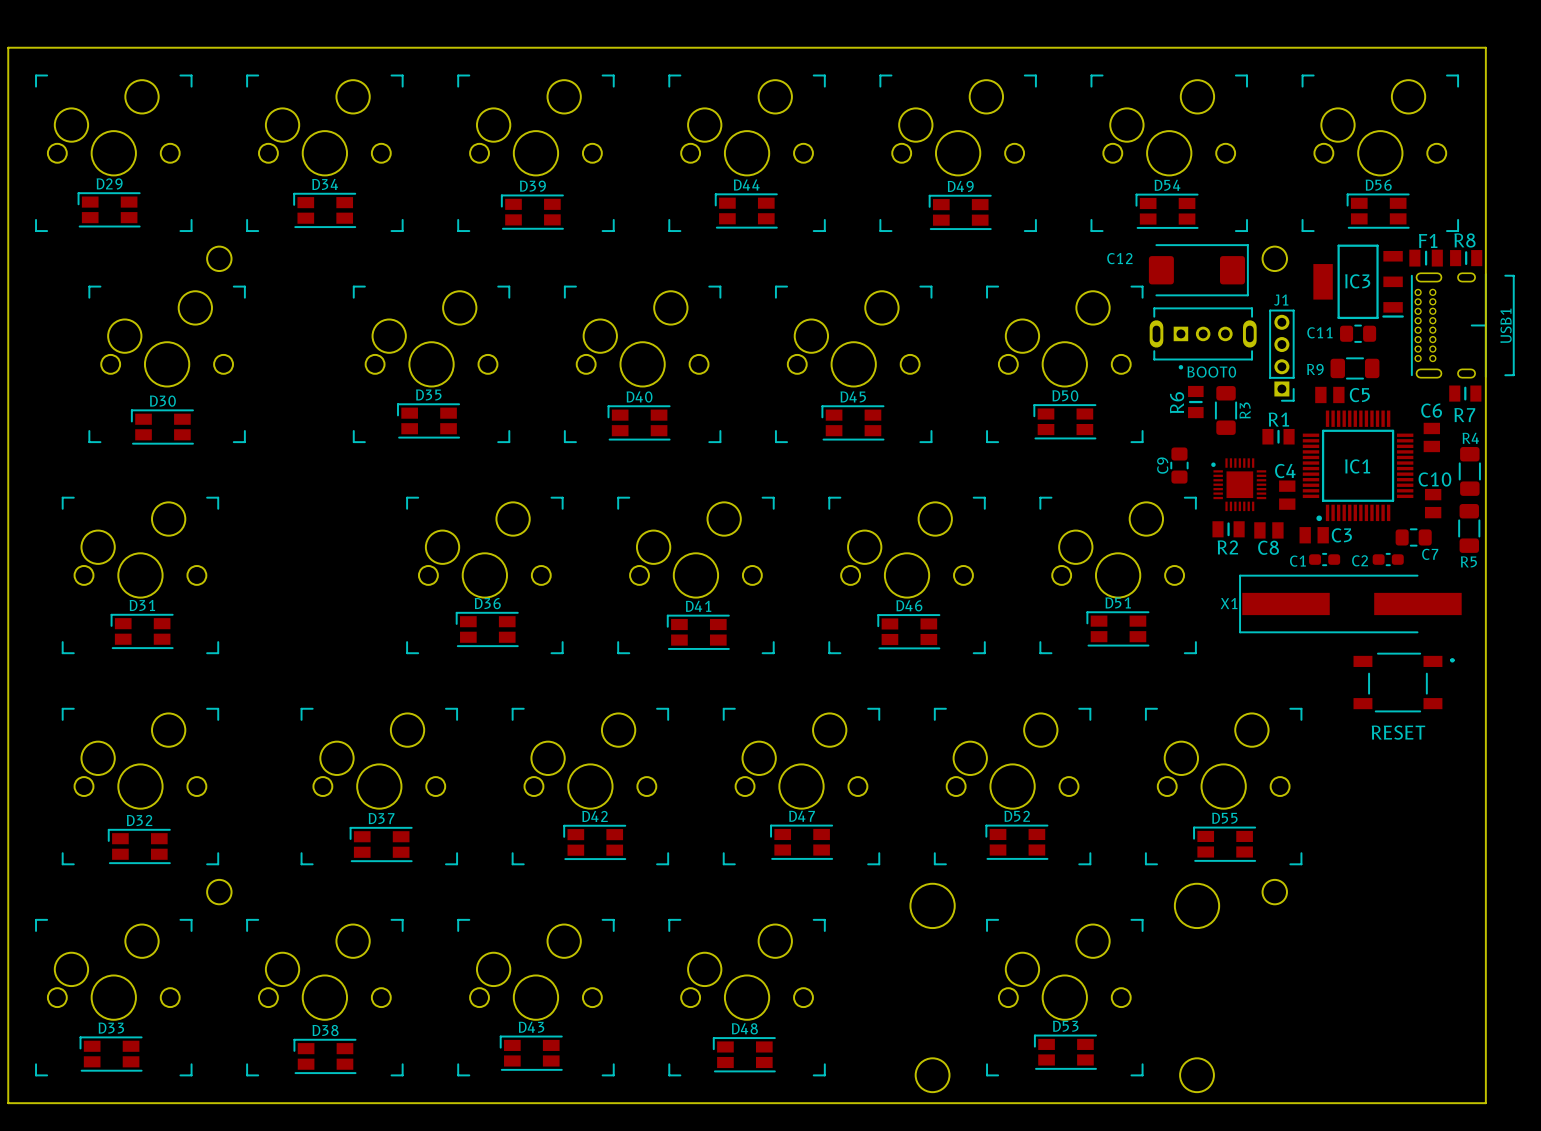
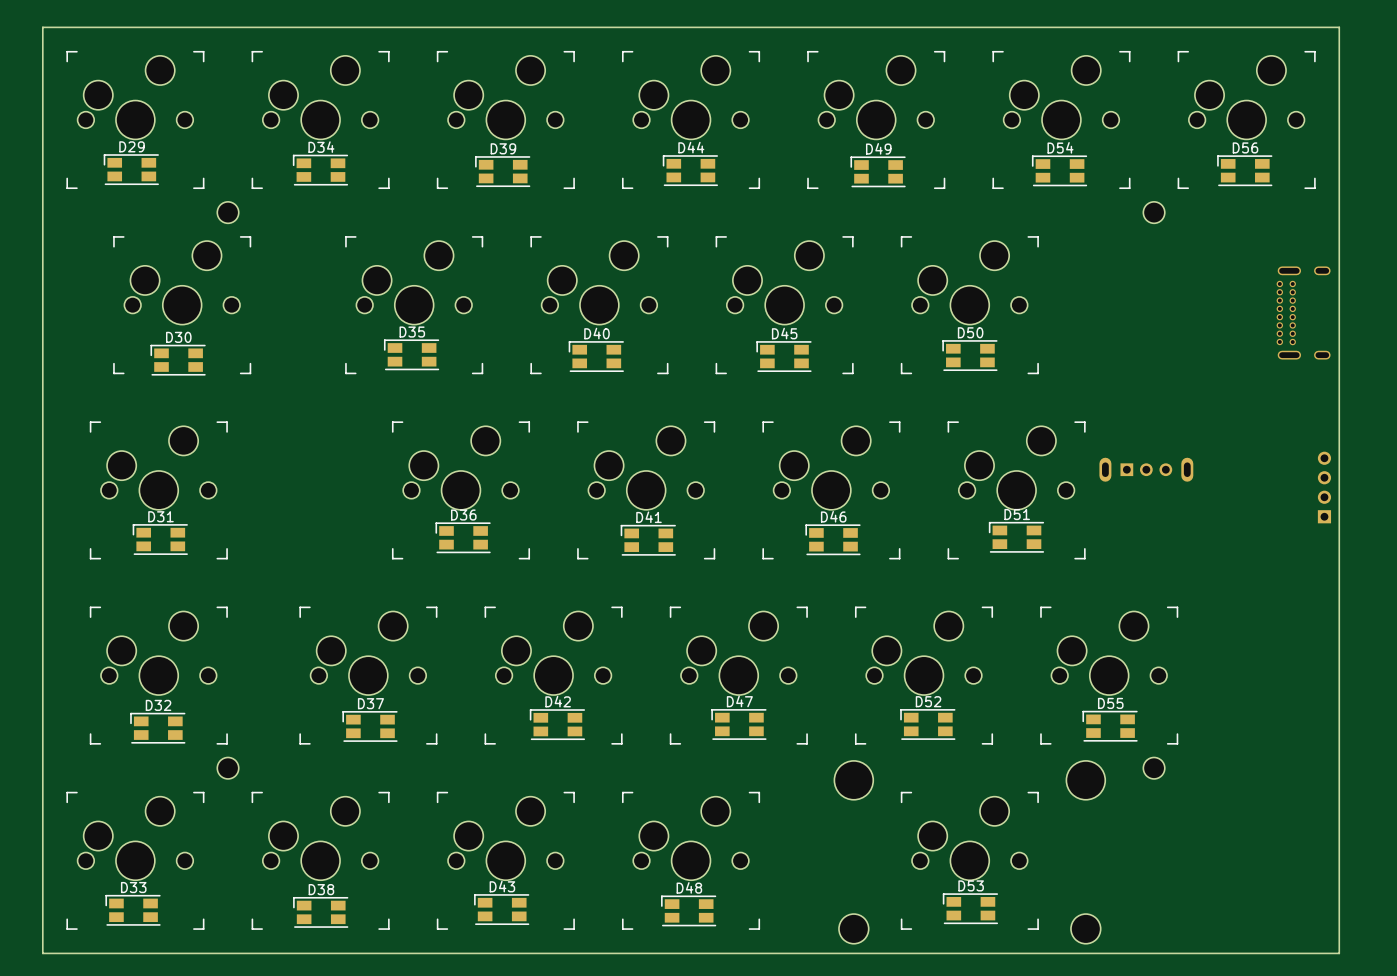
F1: (1426, 258) -> none
R8: (1466, 258) -> none
C12: (1198, 270) -> none
IC3: (1358, 281) -> none
USB1 side: top (1462, 325) -> bottom (1303, 312)
C11: (1358, 333) -> none
BOOT0 side: top (1203, 338) -> bottom (1146, 469)
J1: (1281, 355) -> none
R9: (1354, 368) -> none
R7: (1465, 393) -> none
C5: (1329, 394) -> none
R6: (1195, 402) -> none
R3: (1226, 410) -> none
R1: (1278, 436) -> none
C6: (1431, 437) -> none
C9: (1179, 465) -> none
IC1: (1358, 465) -> none
R4: (1469, 471) -> none
part: (1238, 484) -> none
C4: (1287, 495) -> none
C10: (1433, 503) -> none
R5: (1469, 528) -> none
R2: (1228, 529) -> none
C8: (1268, 530) -> none
C3: (1314, 535) -> none
C7: (1413, 537) -> none
C1: (1324, 559) -> none
C2: (1388, 559) -> none
part: none -> (1324, 487)
X1: (1350, 603) -> none
RESET: (1404, 682) -> none

